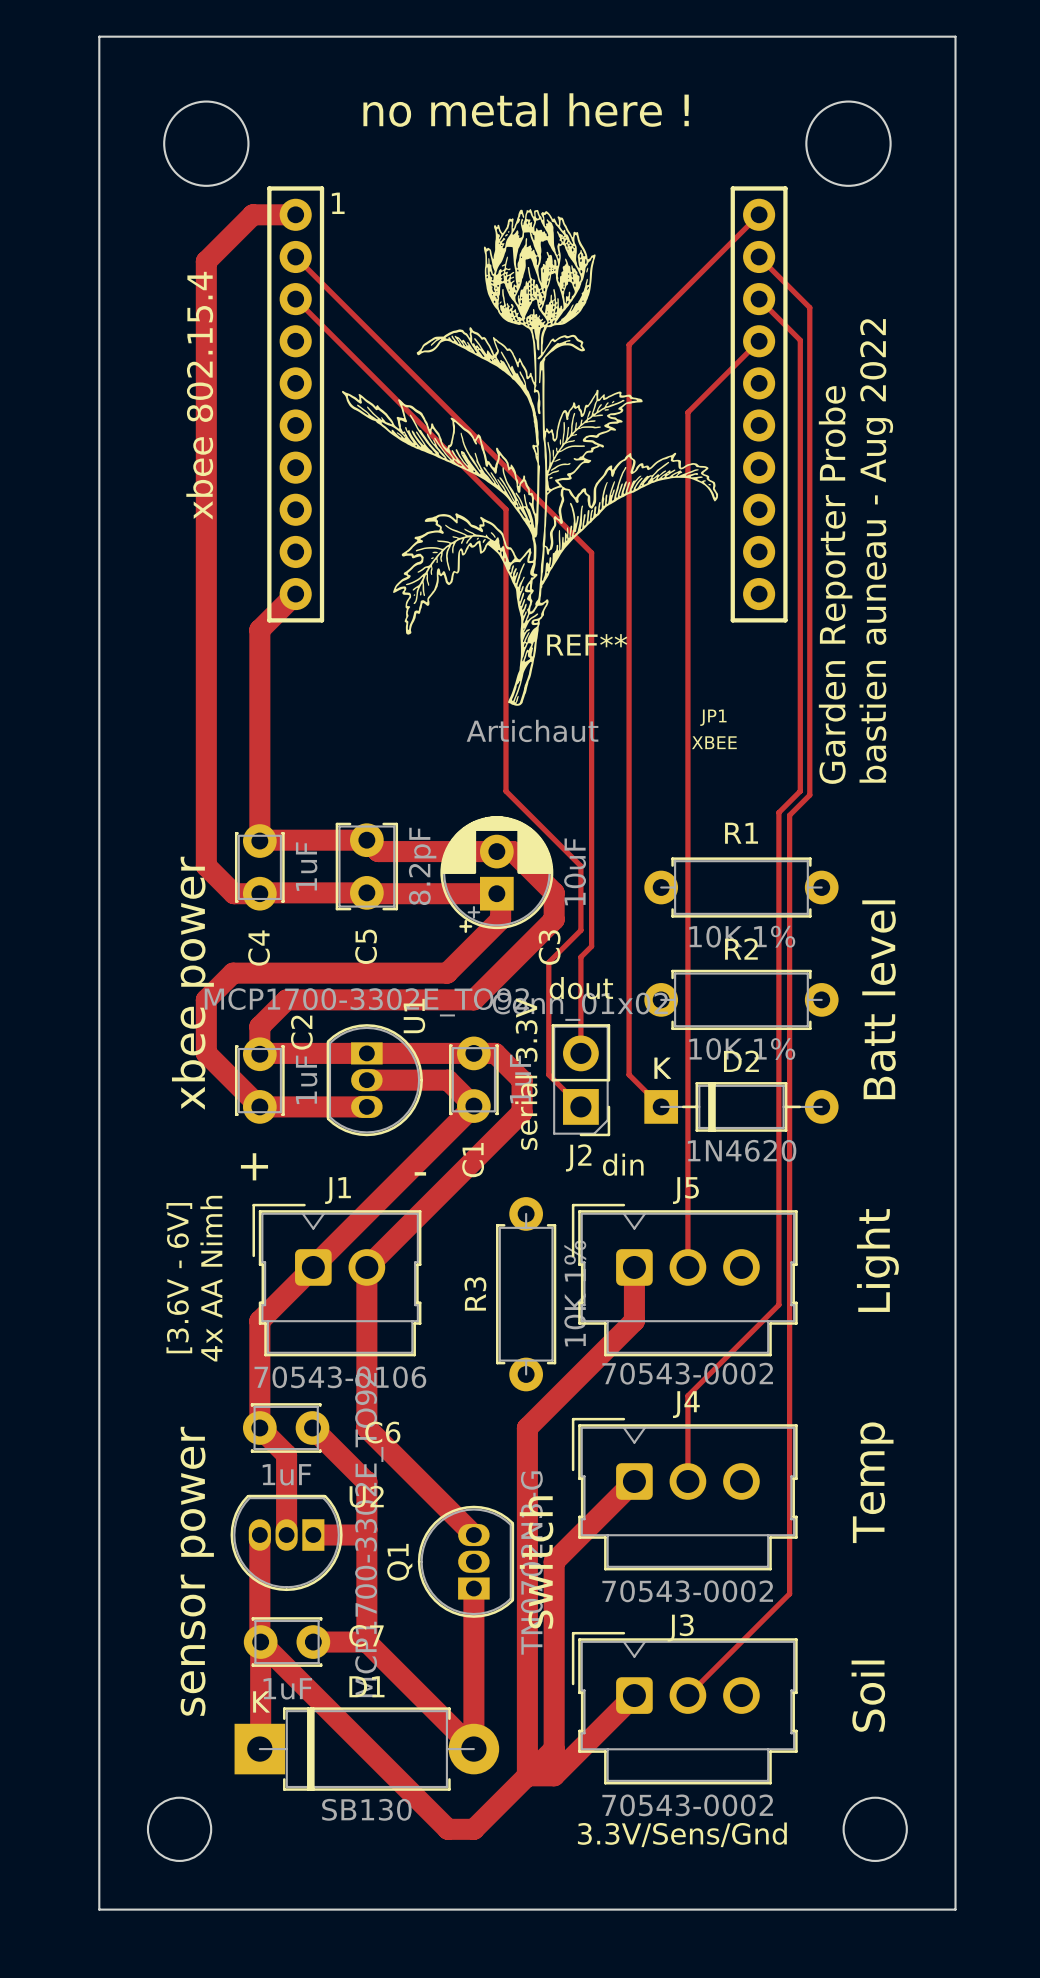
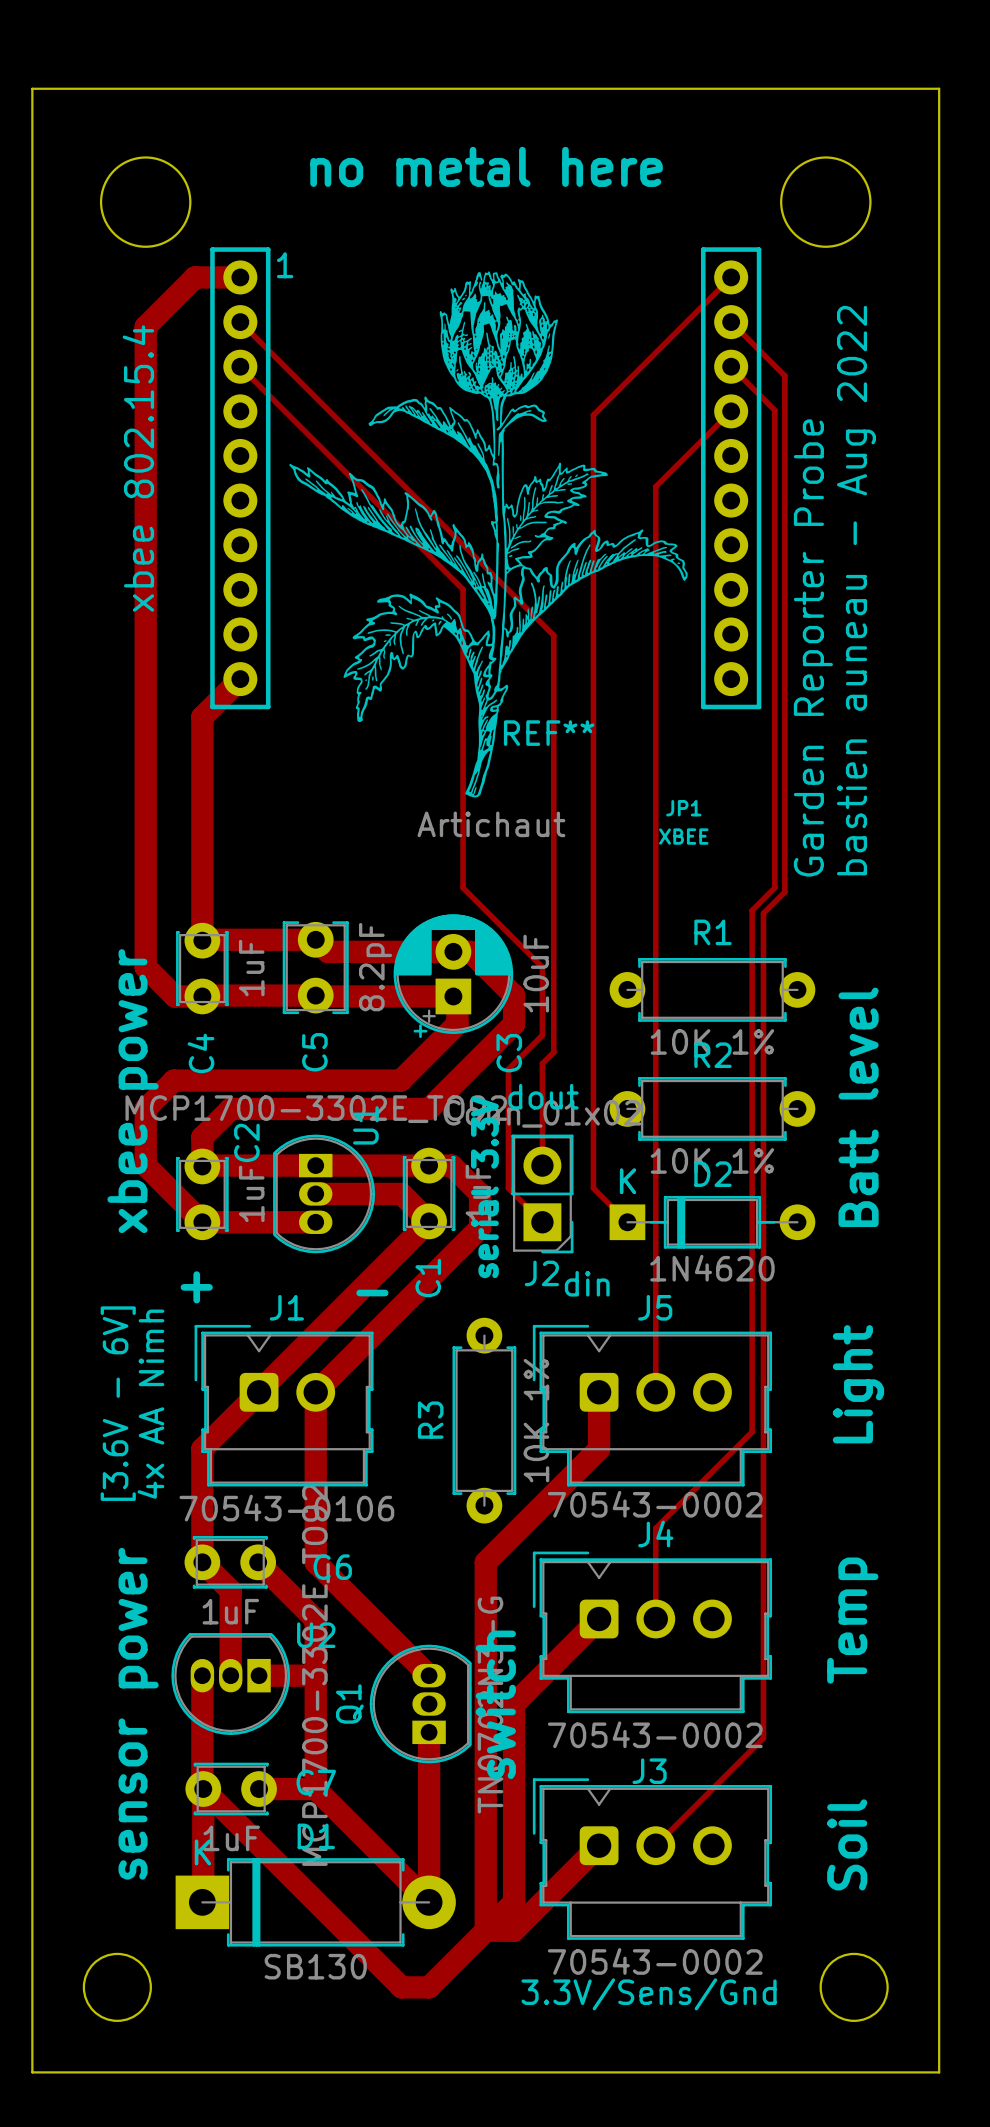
text: no metal here ! (526, 110) -> no metal here (486, 166)

